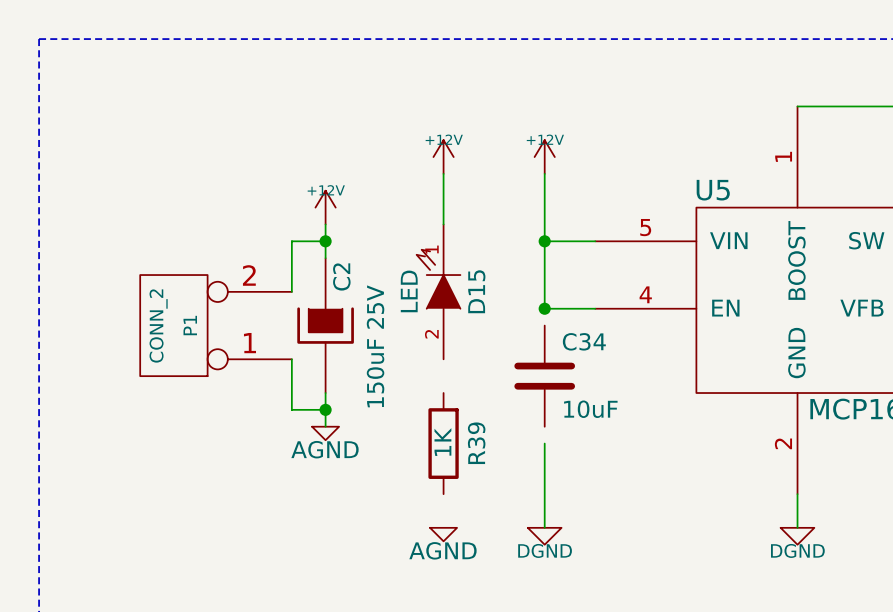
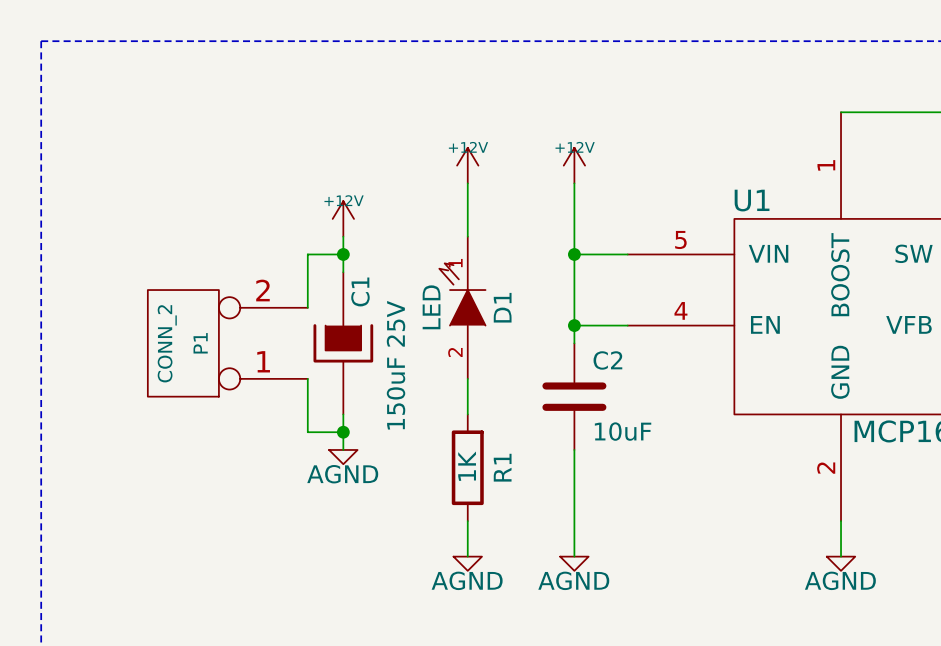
U5 name: U5 (713, 190) -> U1 (752, 200)
C2 name: C2 (341, 276) -> C1 (360, 291)
D15 name: D15 (476, 291) -> D1 (502, 307)
wire: none -> (574, 325) (574, 343)
C34 name: C34 (584, 341) -> C2 (607, 360)
wire: none -> (467, 378) (467, 414)
wire: none -> (574, 449) (574, 467)
R39 name: R39 (476, 443) -> R1 (502, 467)
wire: none -> (467, 521) (467, 556)
power symbol: DGND (544, 536) -> AGND (574, 563)
power symbol: DGND (797, 536) -> AGND (841, 563)

